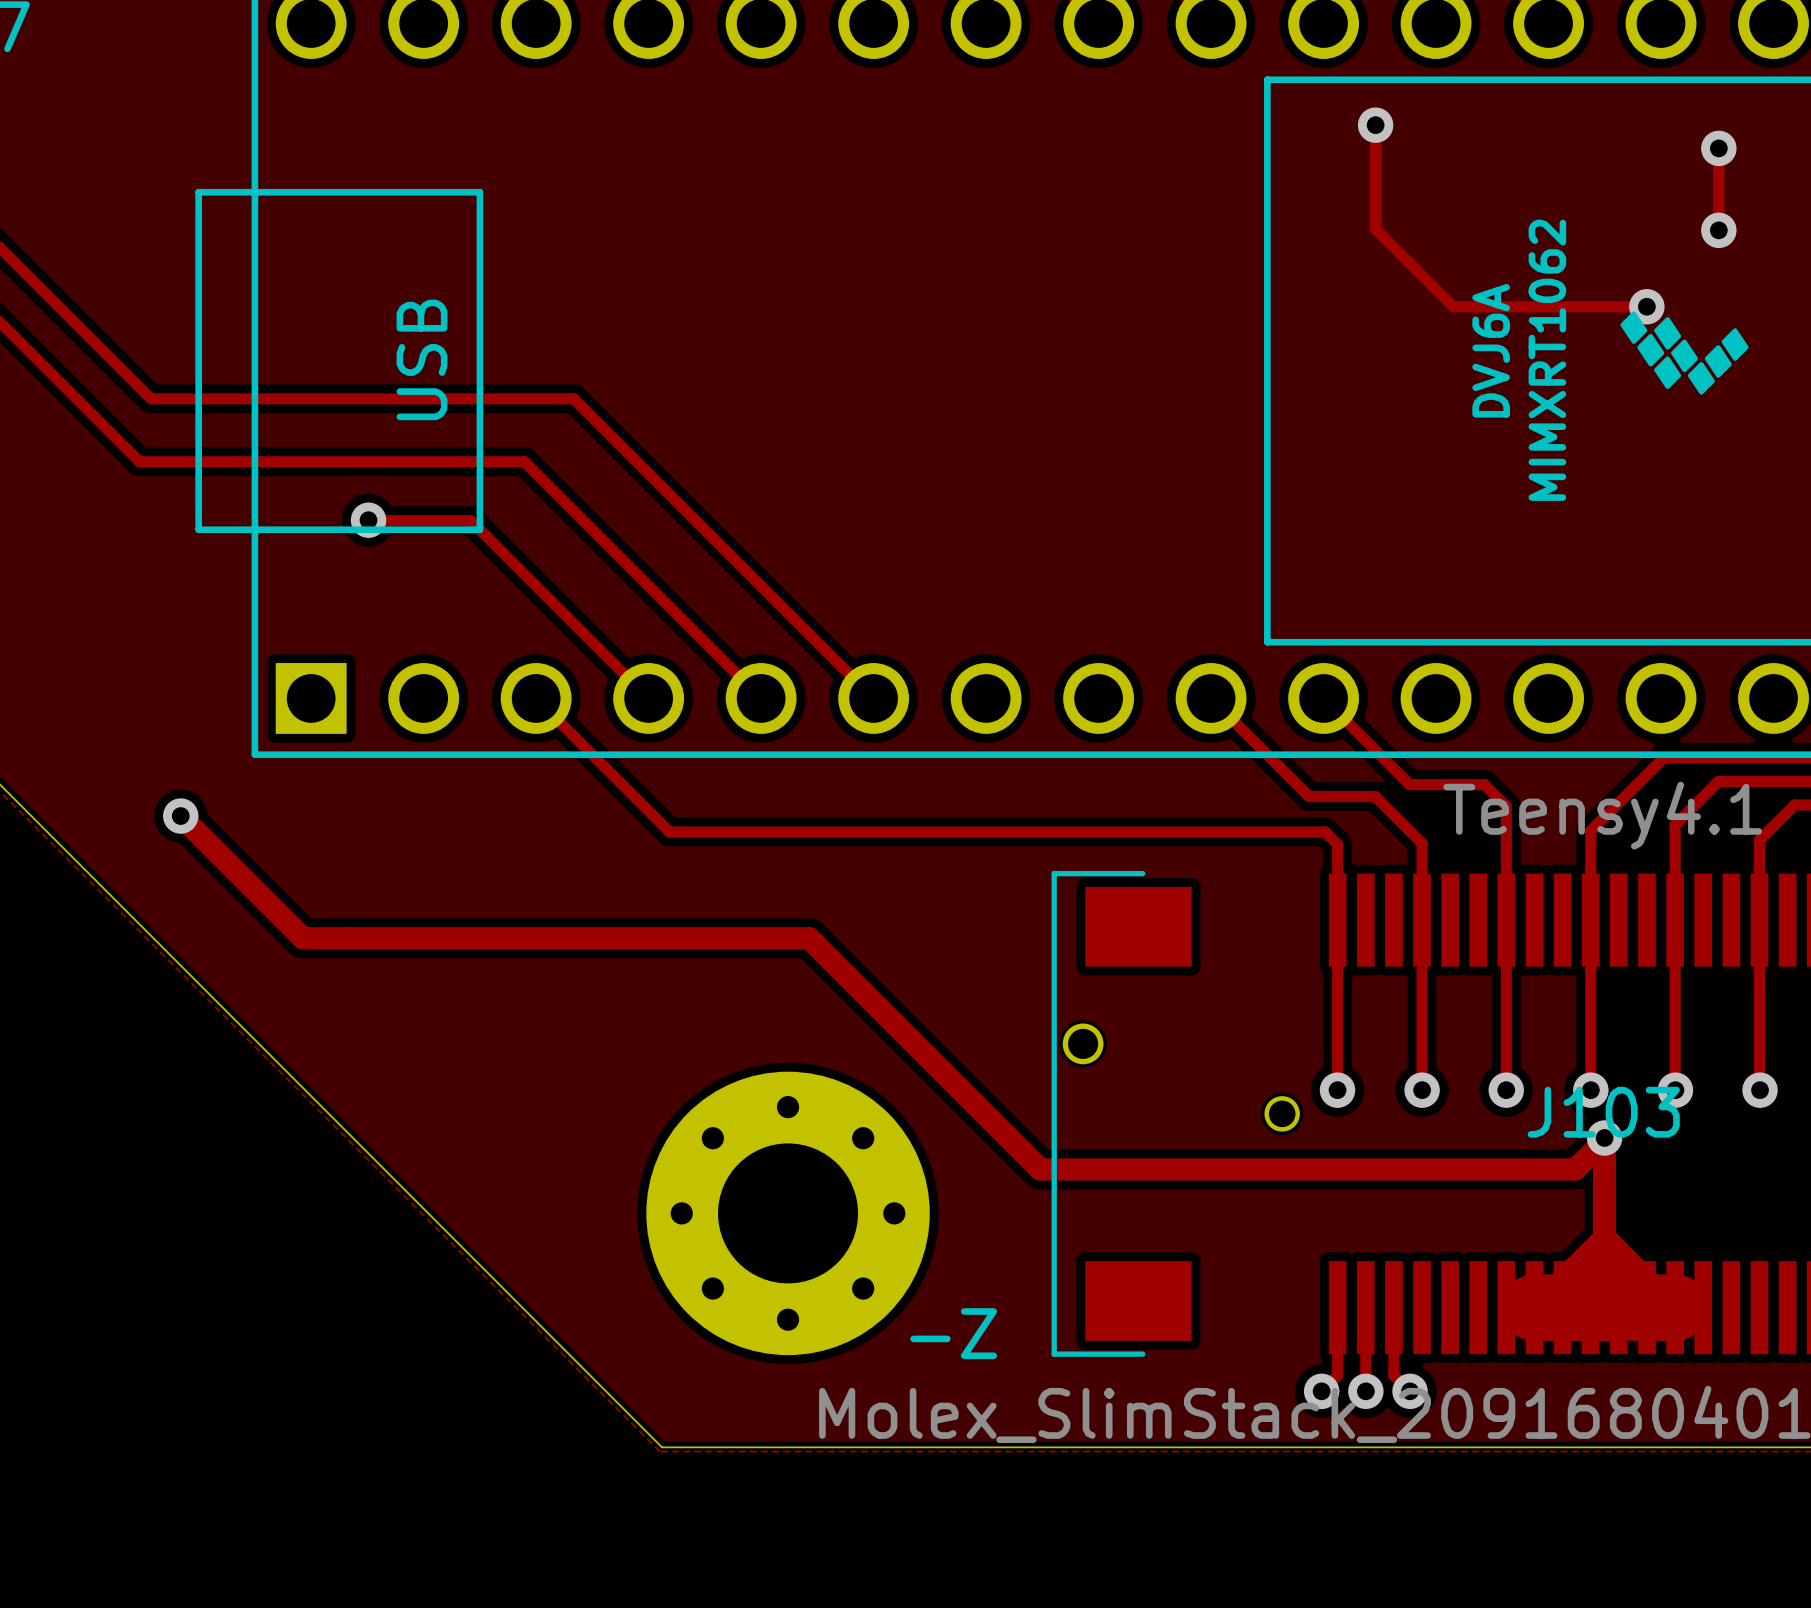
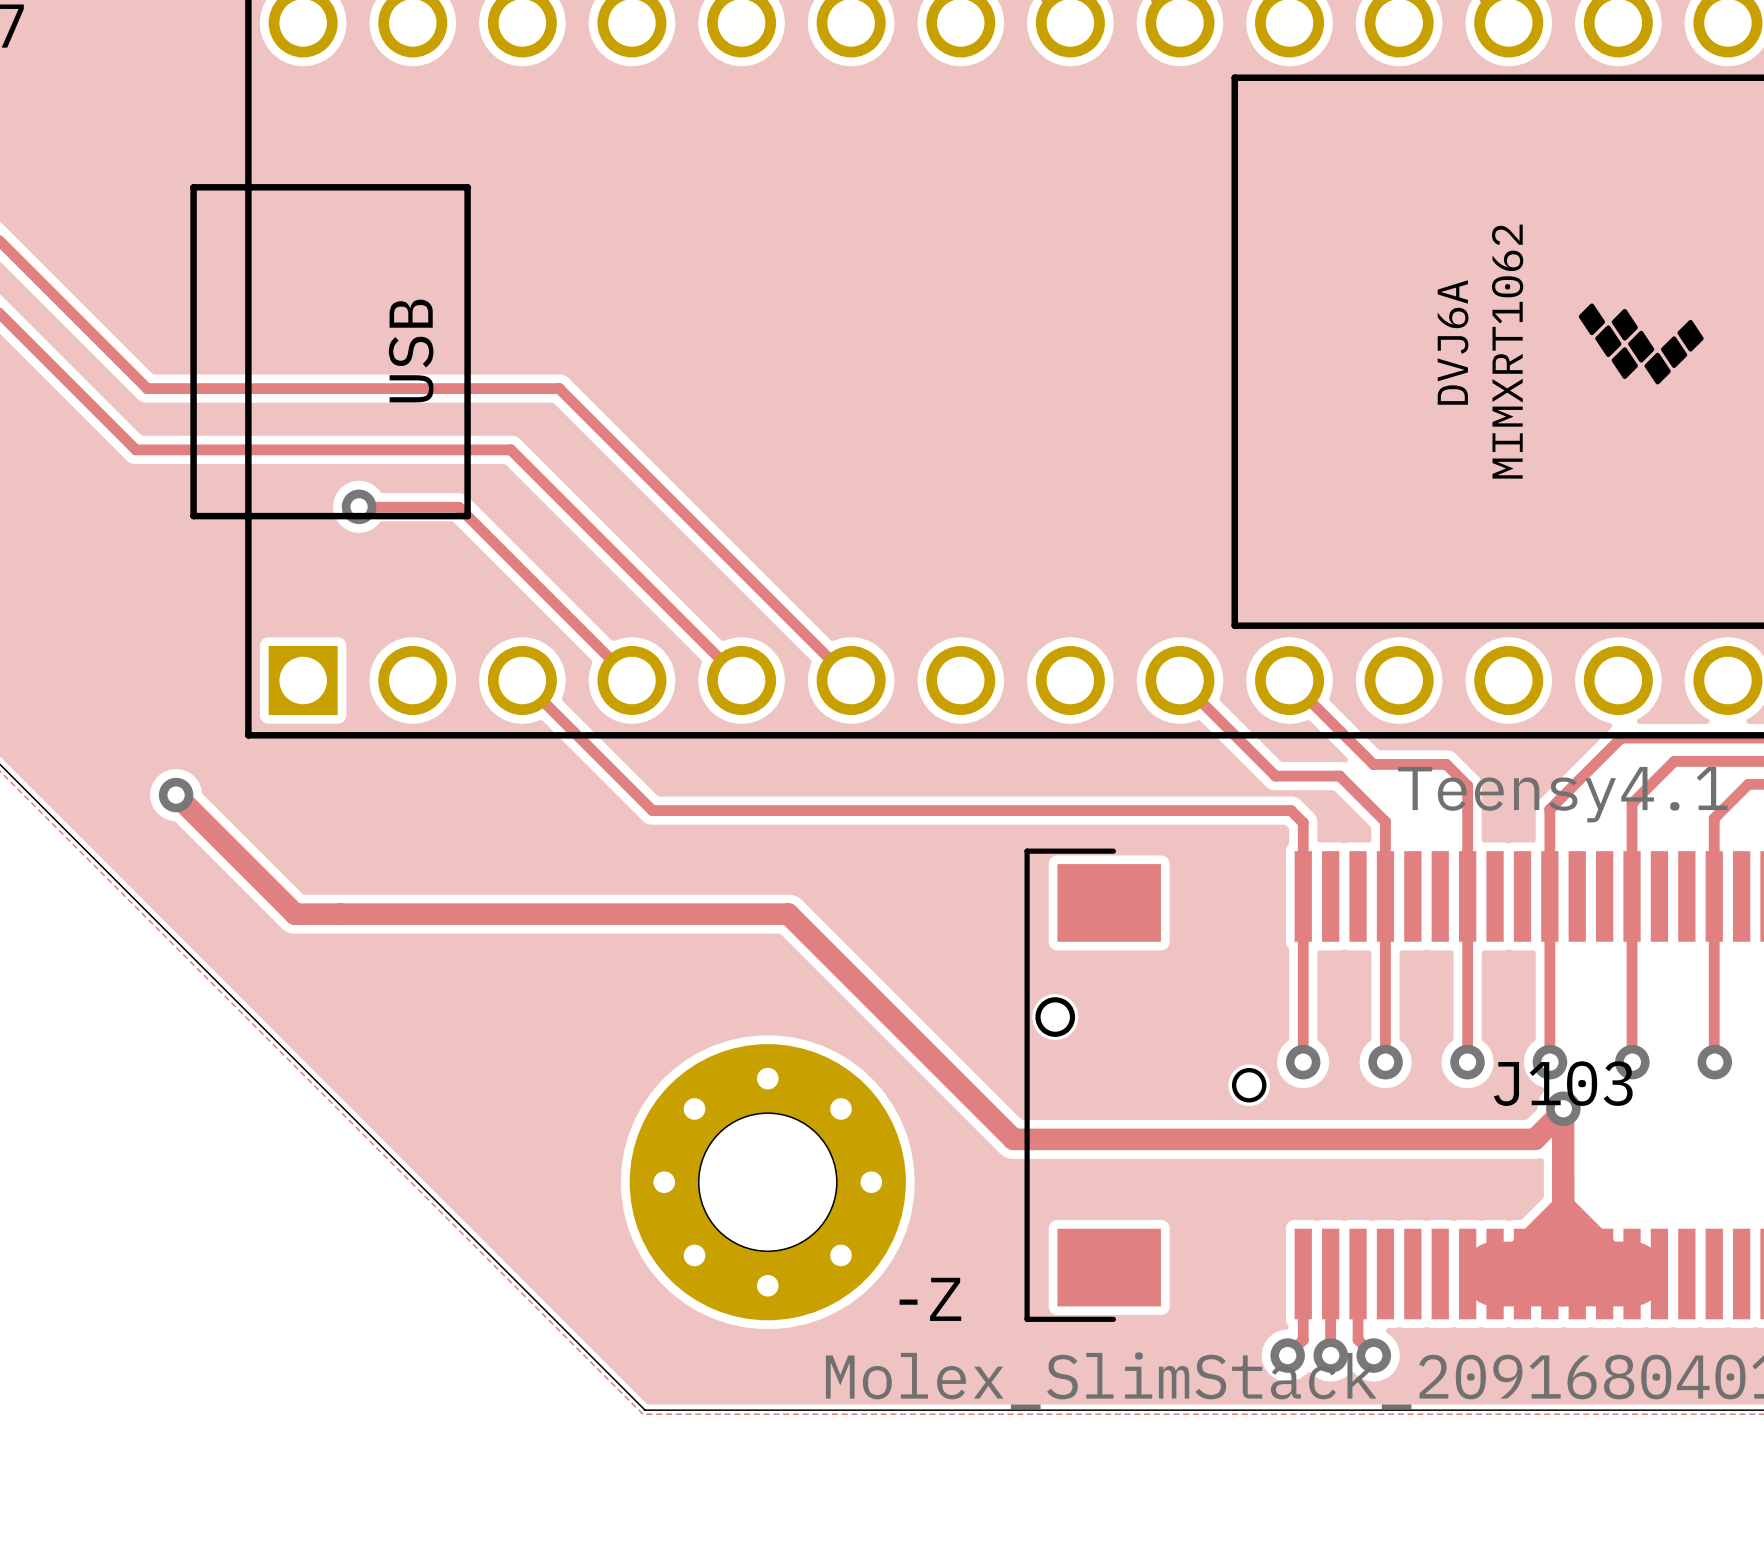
track: (1375, 125) (1375, 229) (1453, 306) (1646, 306) -> none
via: (1375, 125) -> none
track: (1718, 148) (1718, 230) -> none
via: (1718, 148) -> none
via: (1718, 230) -> none
via: (1646, 306) -> none

